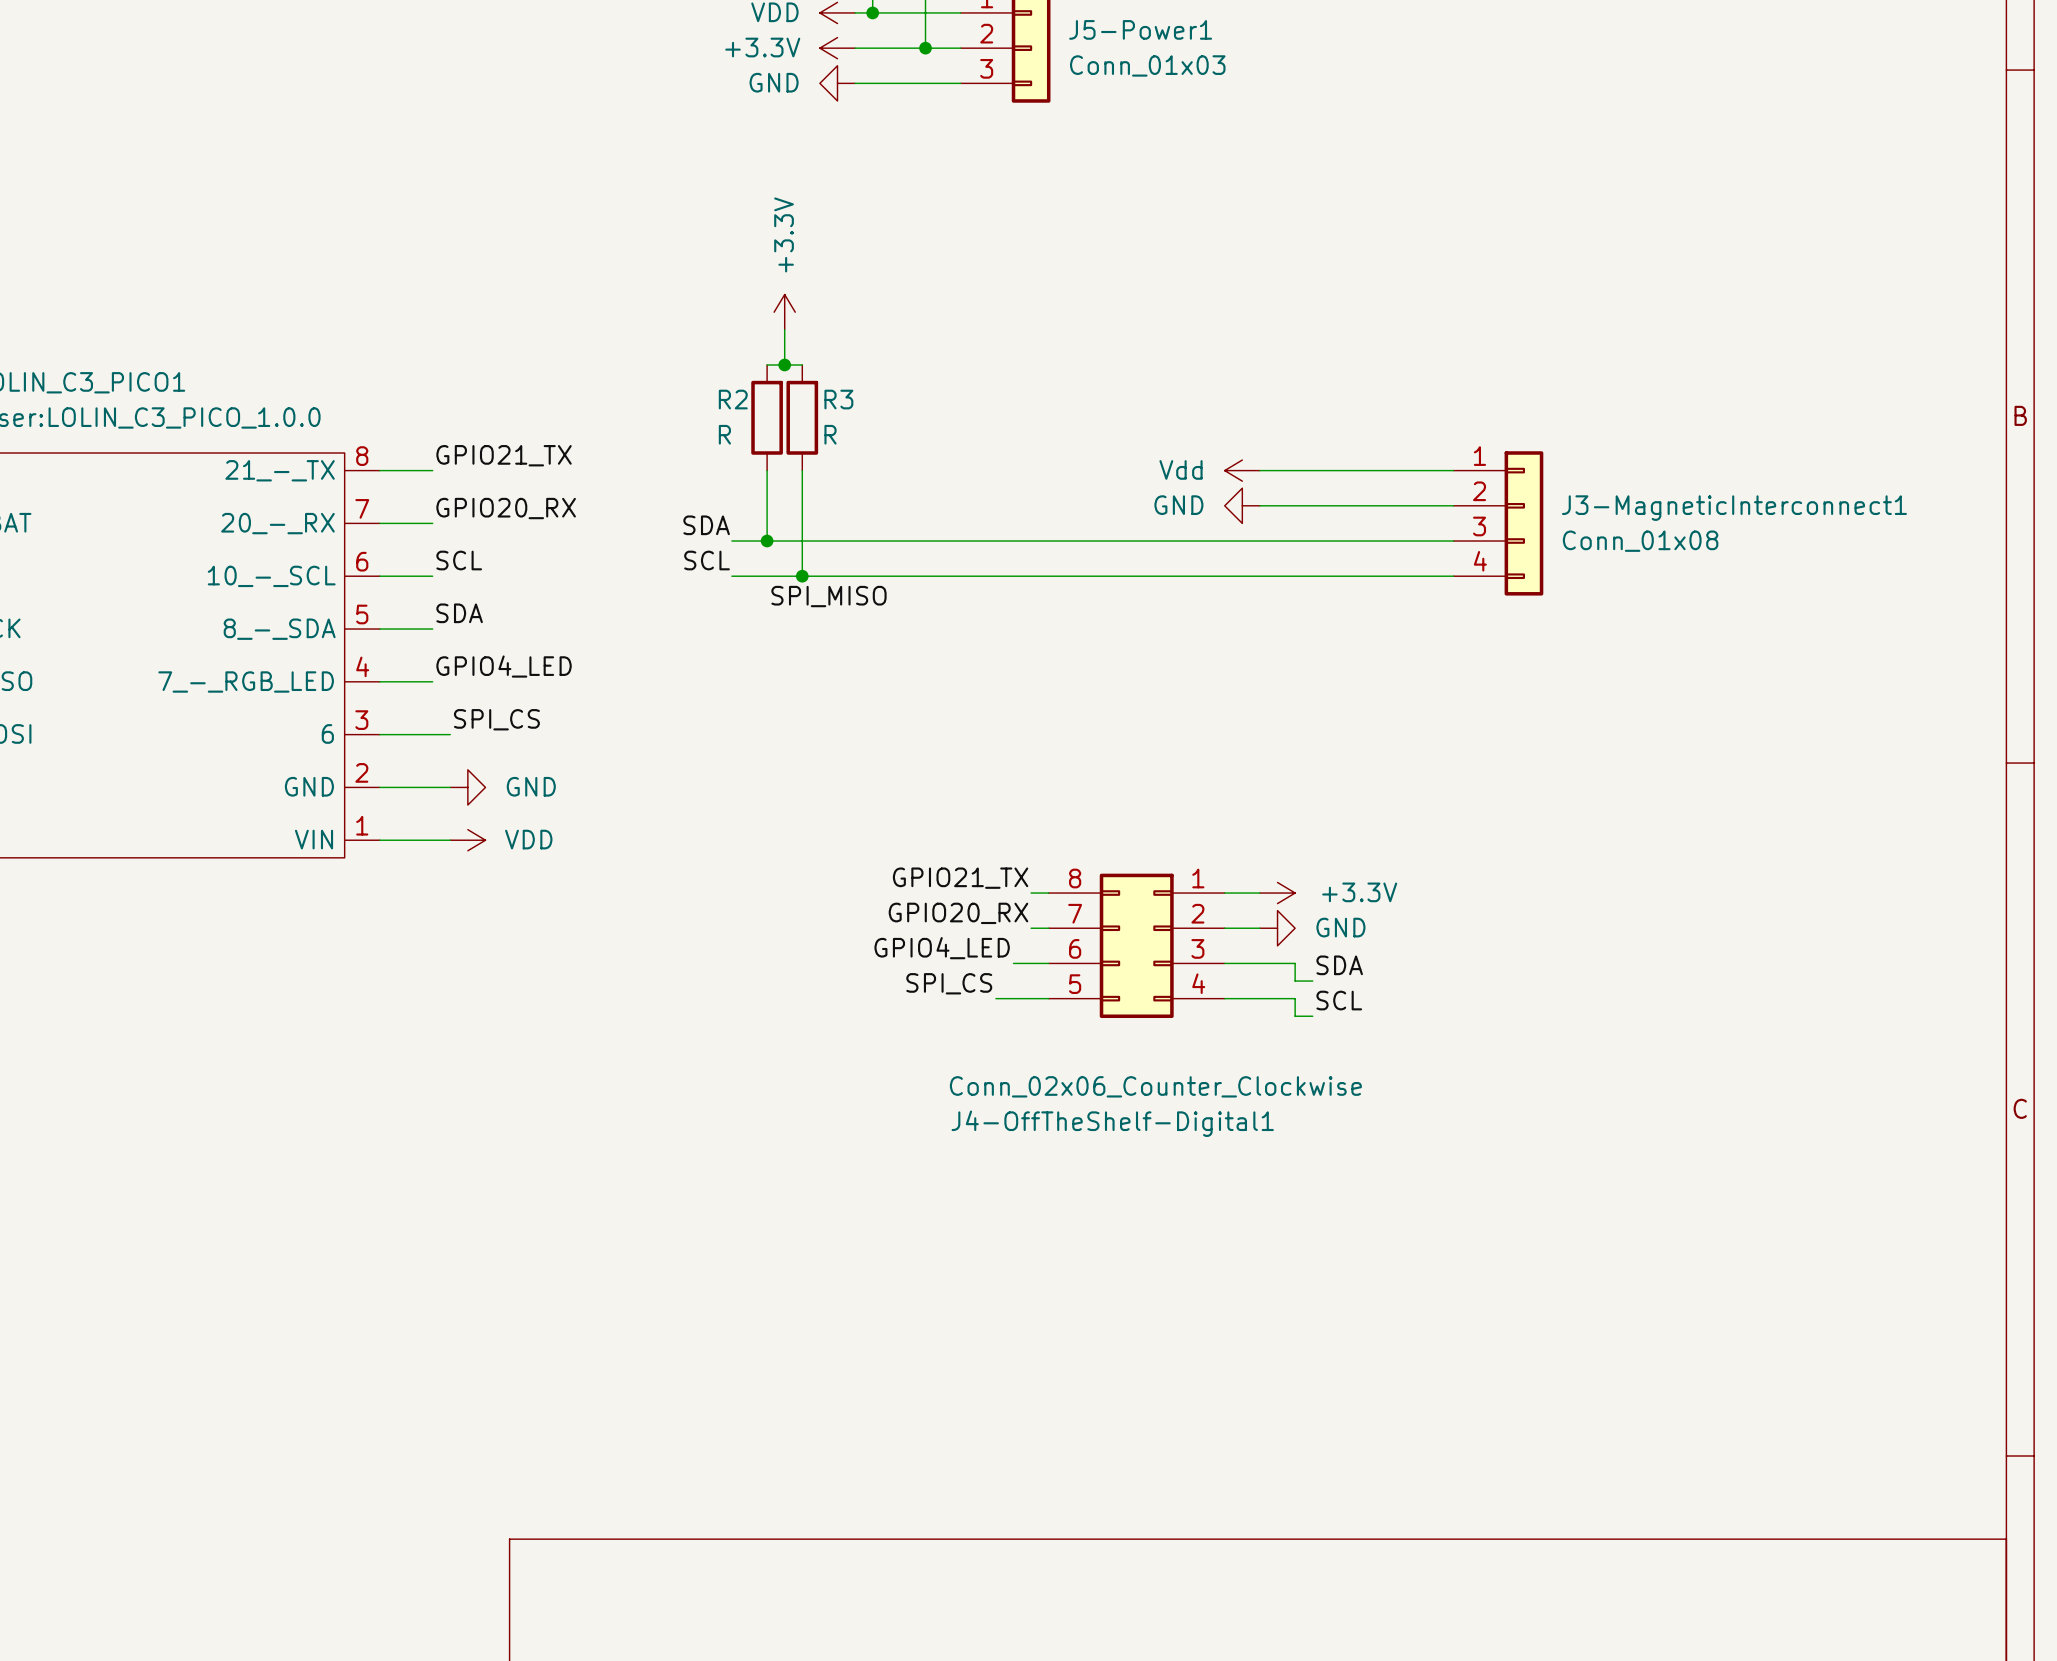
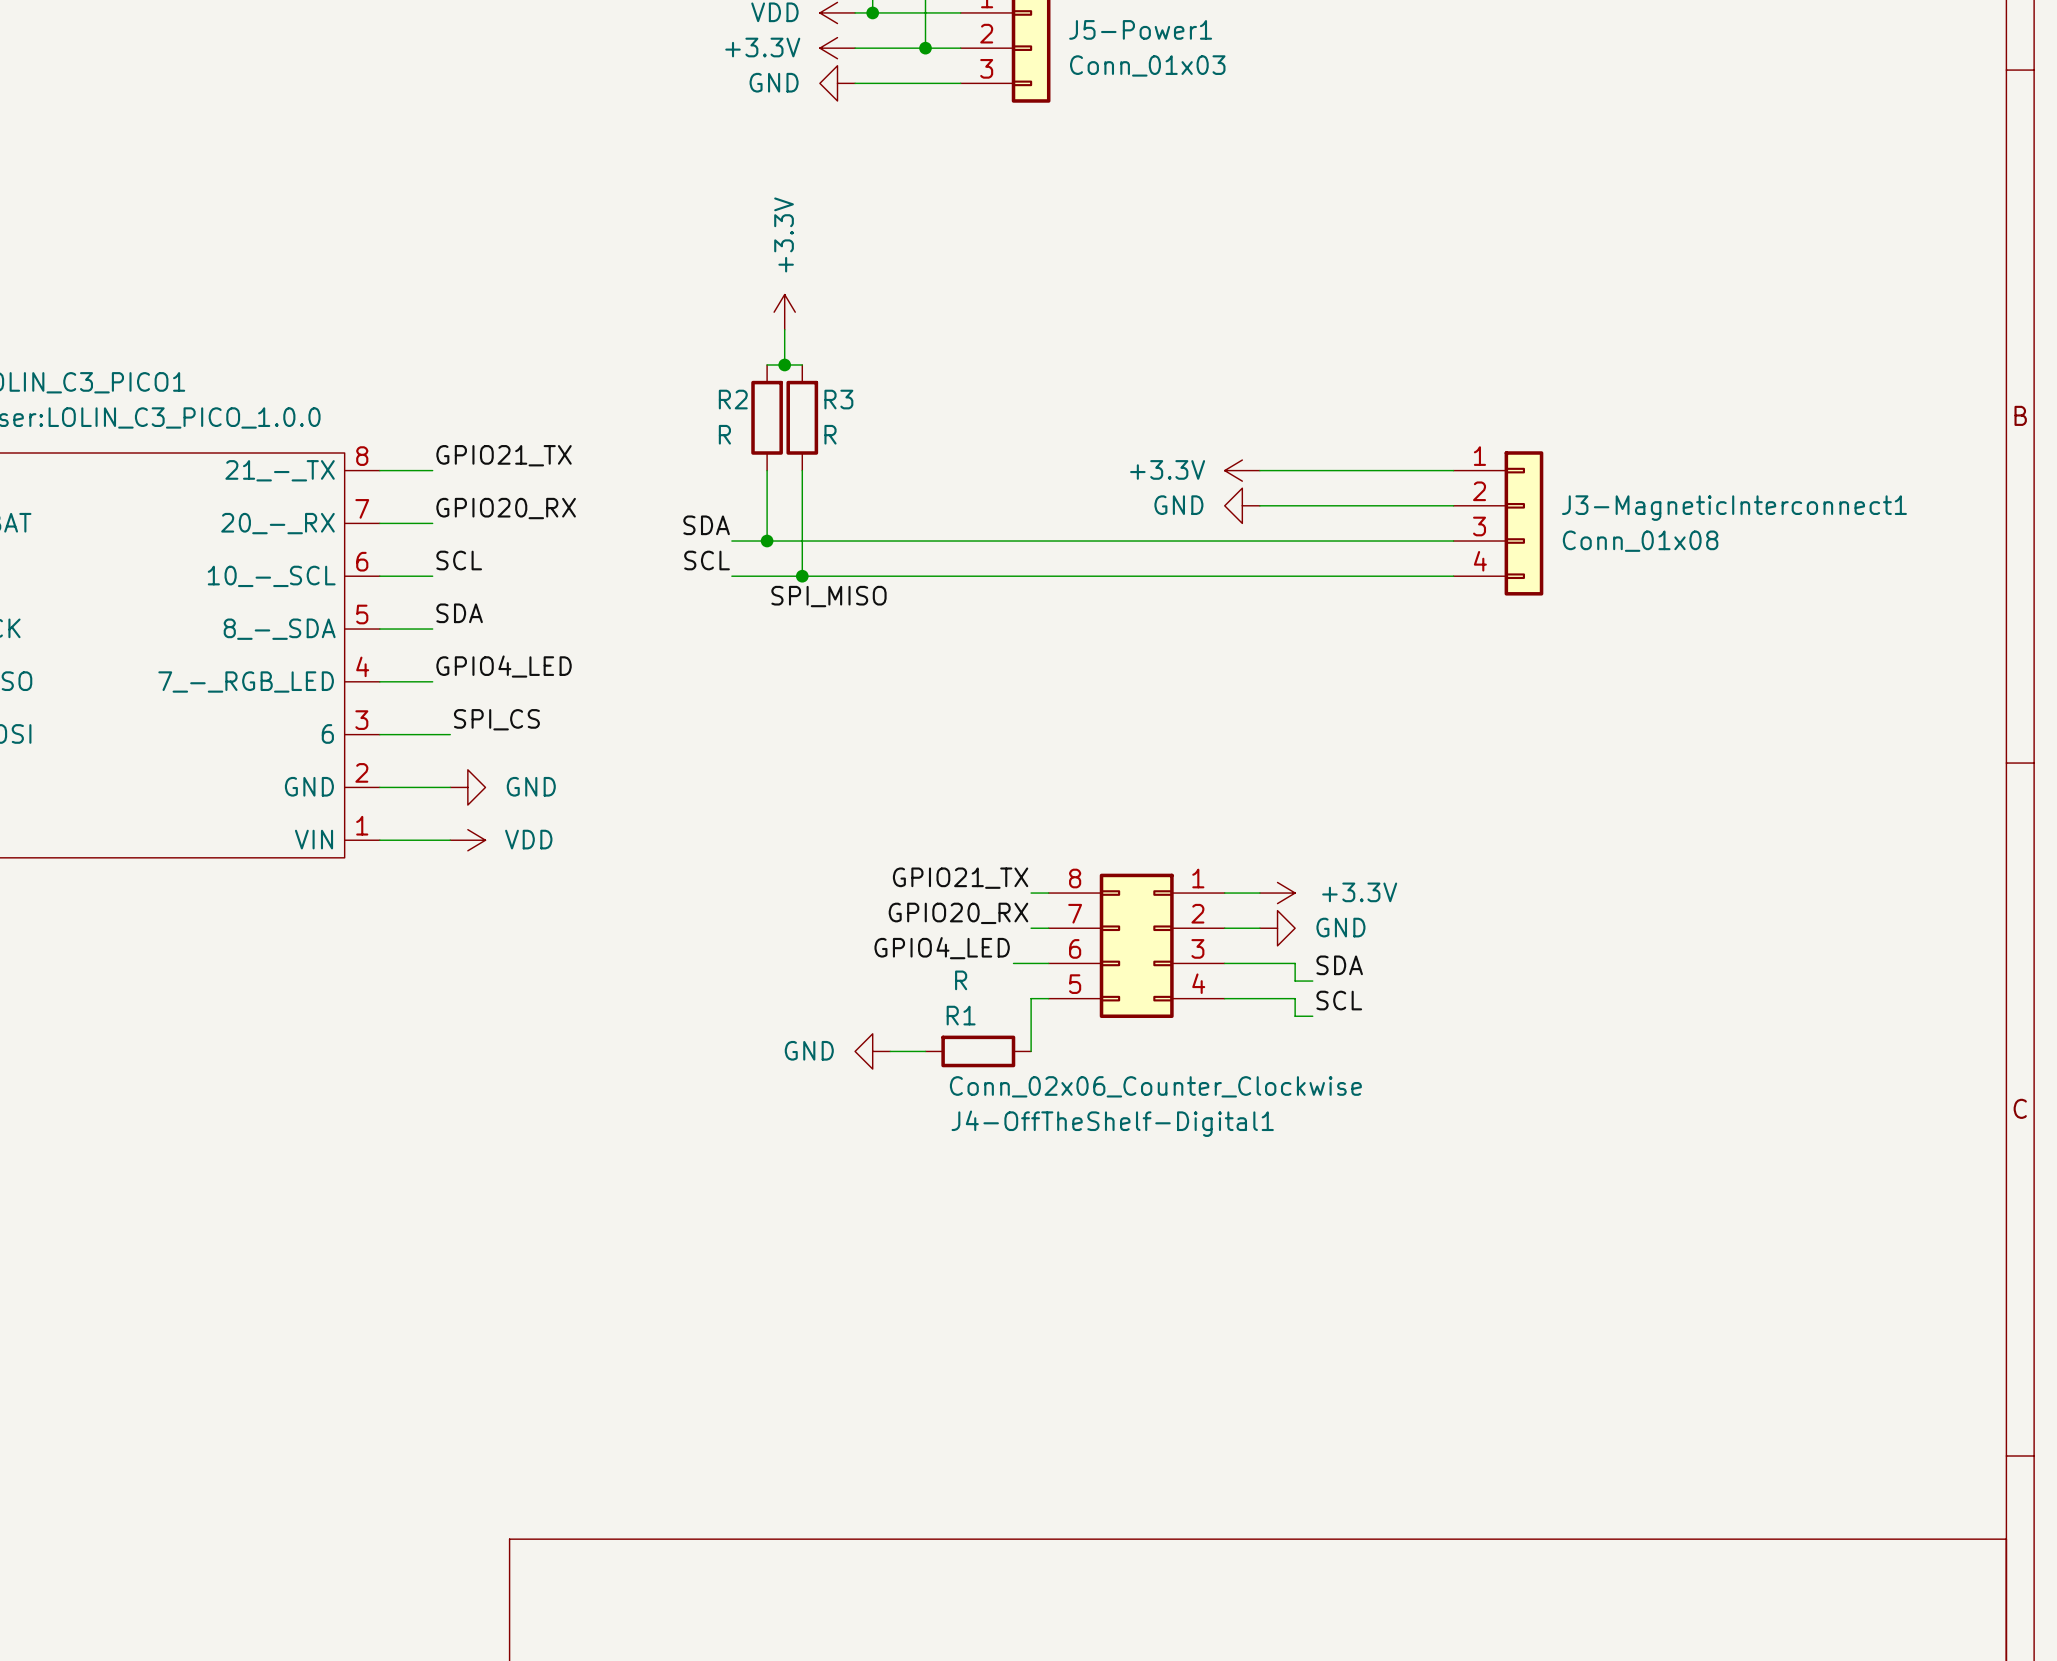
power symbol: Vdd (1242, 470) -> +3.3V (1242, 470)
label: SPI_CS (949, 983) -> none
wire: (995, 998) (1031, 998) -> (1031, 1051) (1031, 998)
power symbol: none -> GND (872, 1051)
wire: none -> (890, 1051) (925, 1051)
R1: none -> R (978, 1051)

